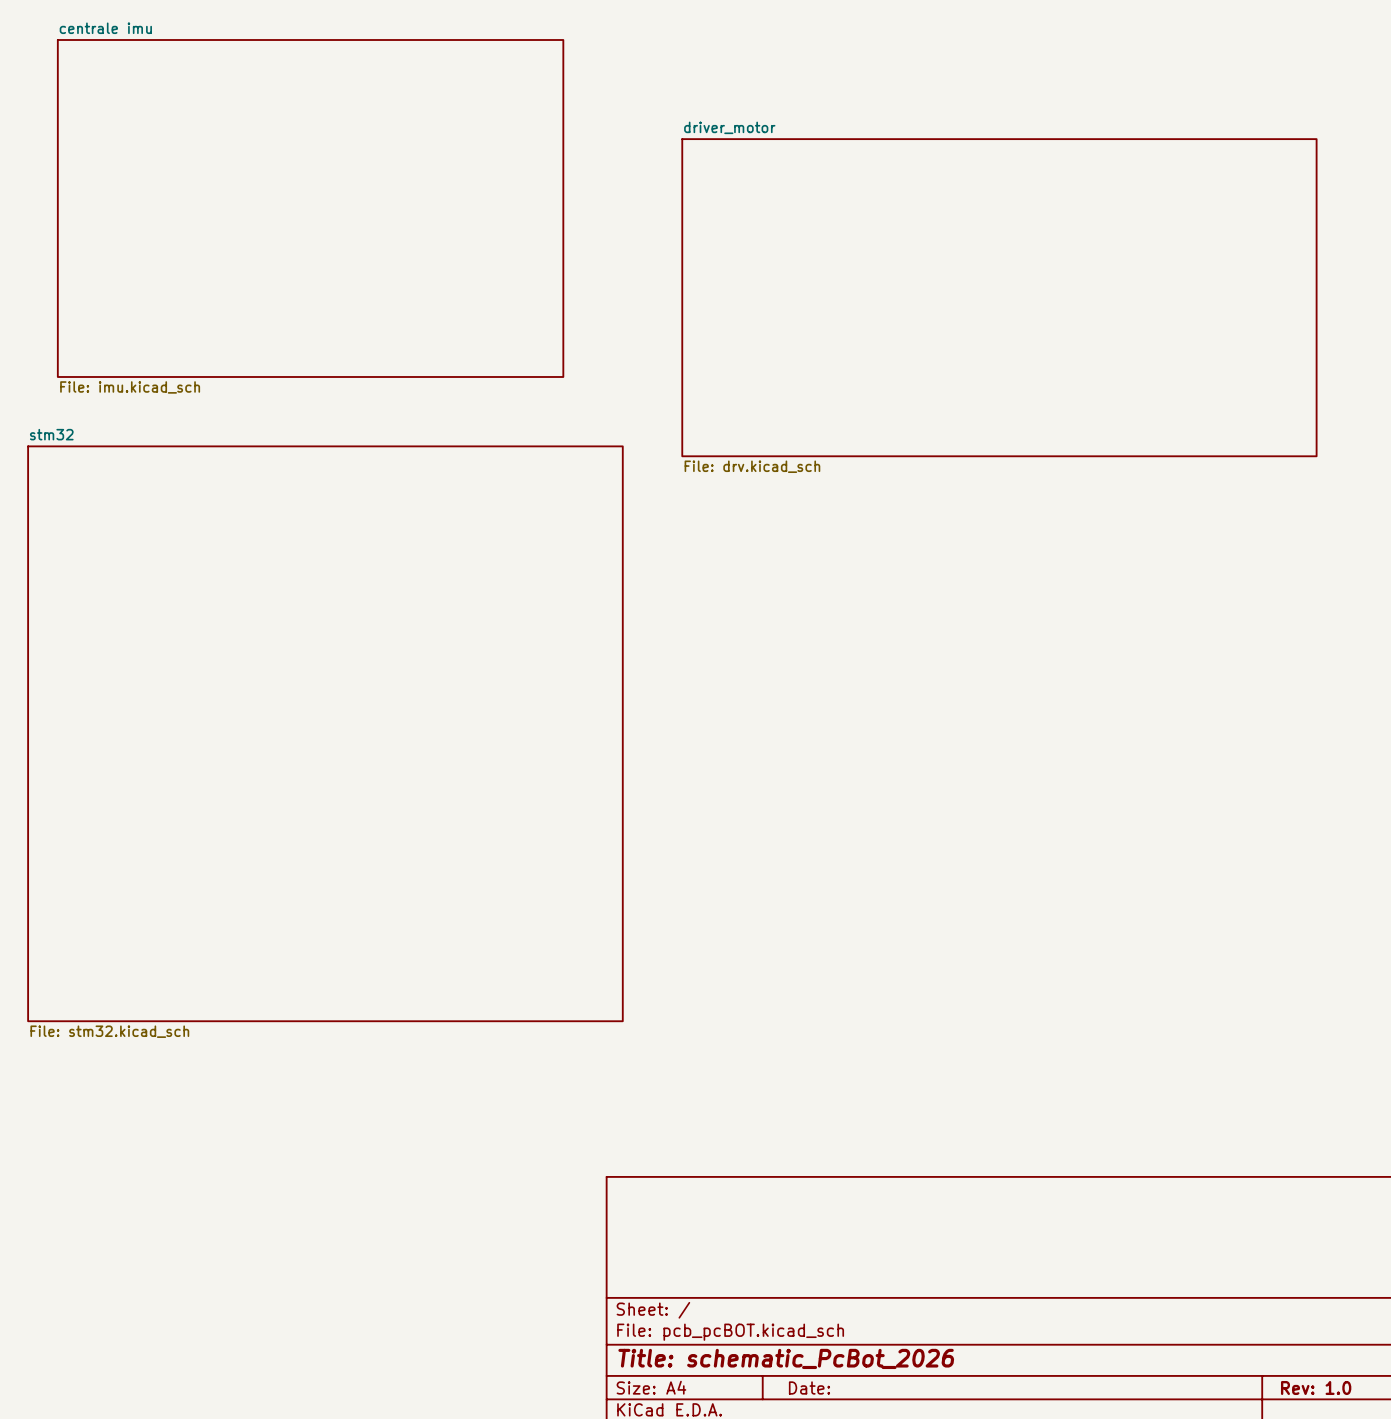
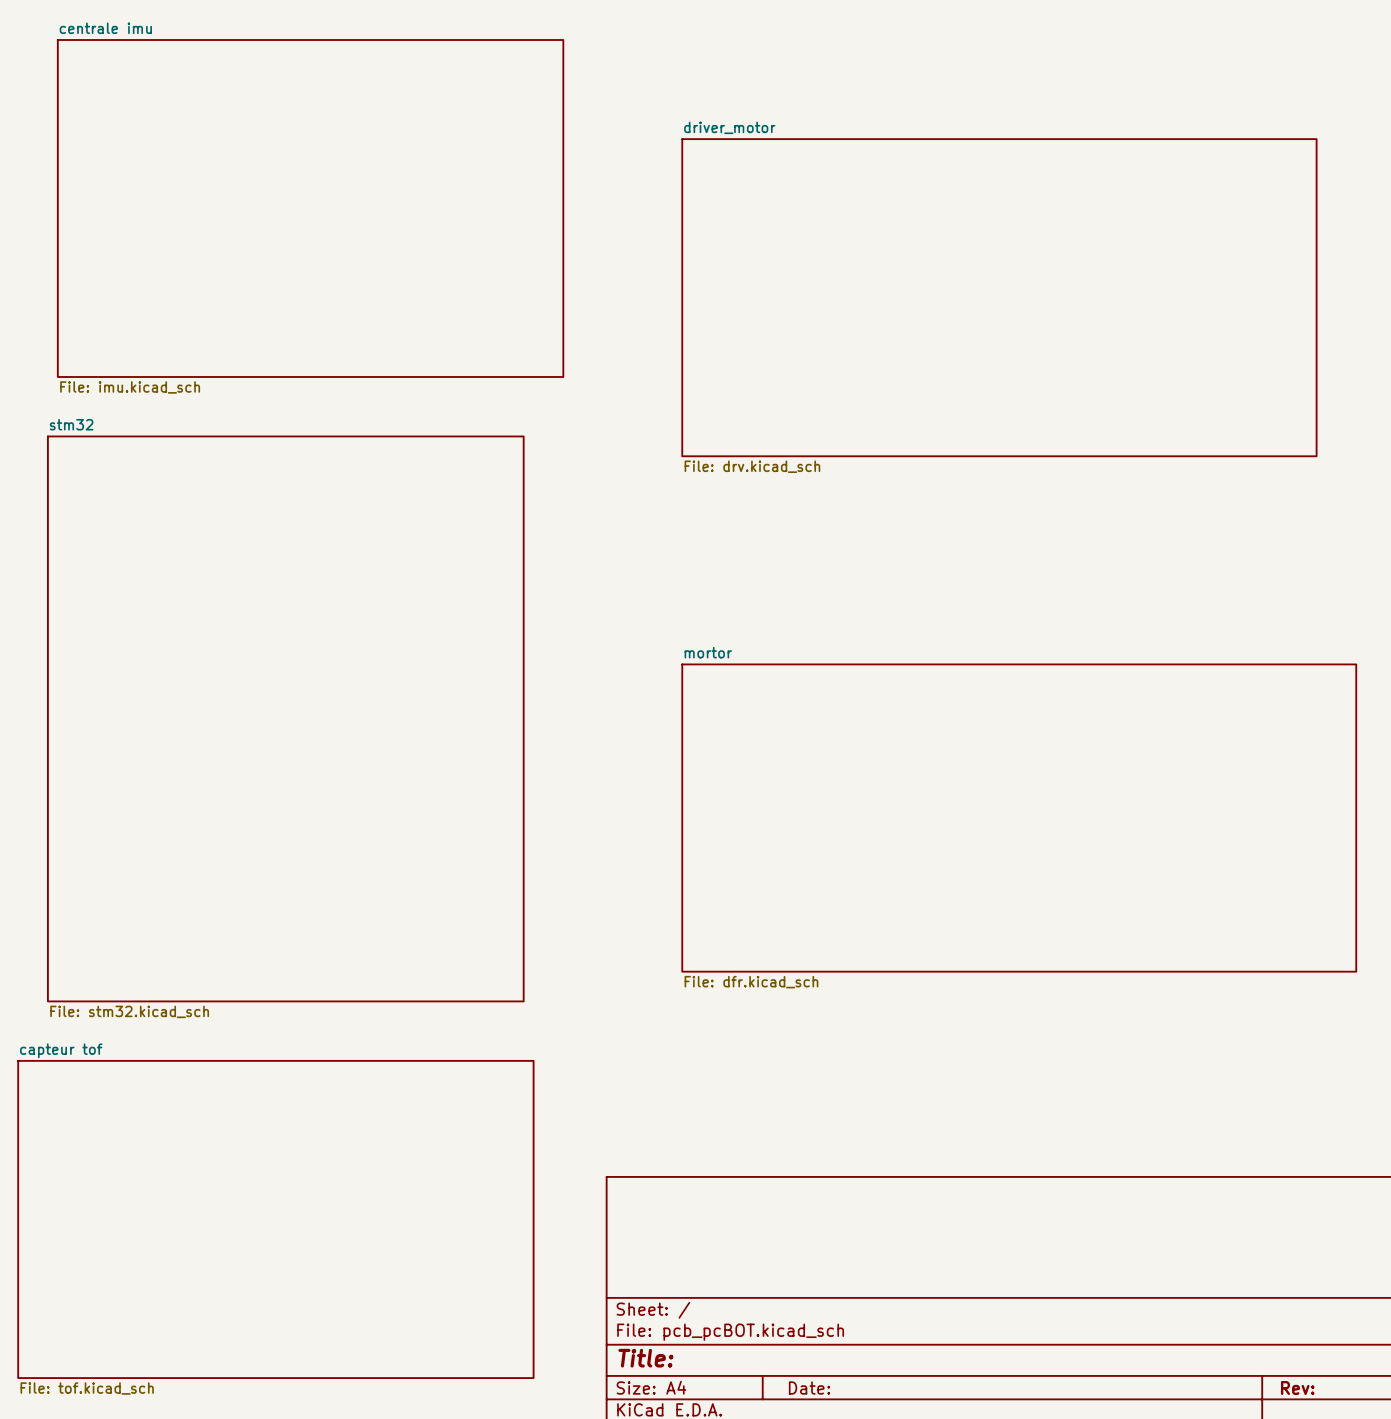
sheet stm32 name position: stm32 (51, 434) -> stm32 (71, 424)
sheet stm32 shape: [27, 445, 624, 1022] -> [47, 435, 525, 1003]
sheet mortor: none -> File: dfr.kicad_sch (1019, 818)
sheet stm32 value position: File: stm32.kicad_sch (109, 1031) -> File: stm32.kicad_sch (129, 1011)
sheet capteur tof: none -> File: tof.kicad_sch (275, 1219)
title block: Title: schematic_PcBot_2026 (786, 1358) -> Title: (645, 1358)
title block: Rev: 1.0 (1316, 1387) -> Rev: (1297, 1387)

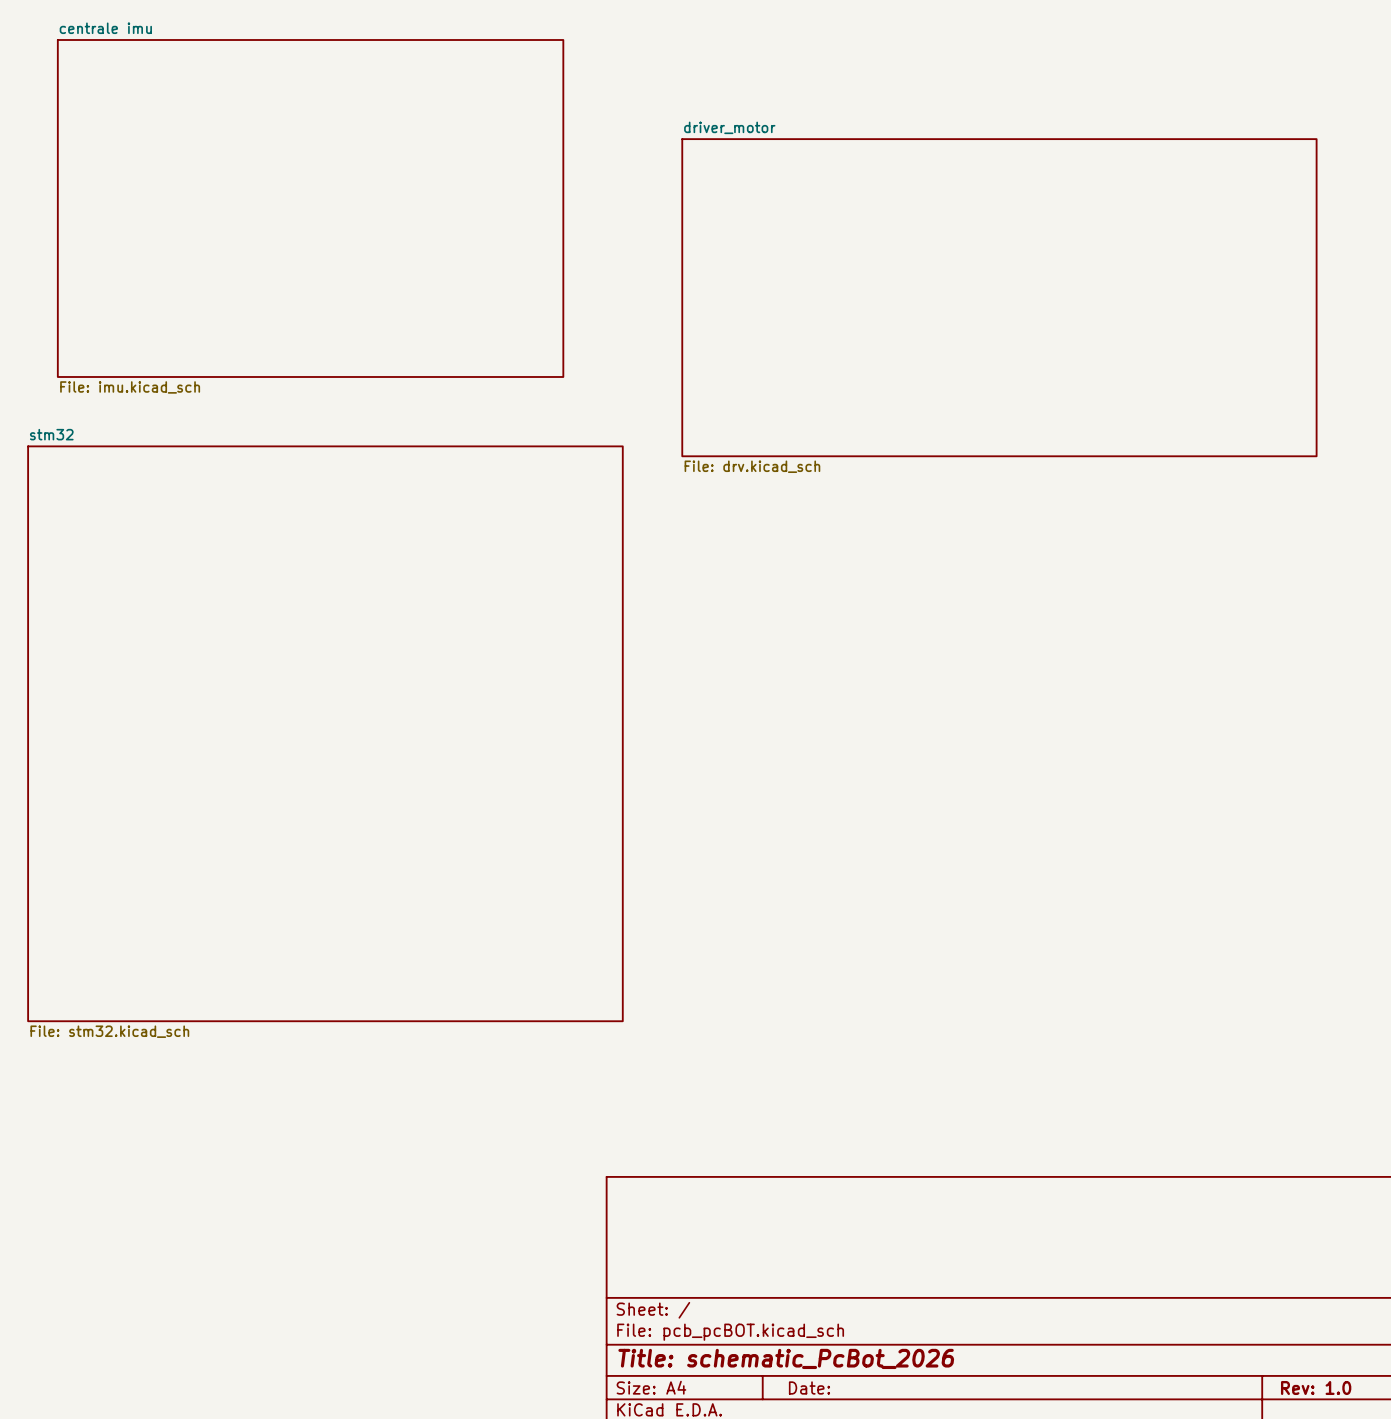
sheet stm32 name position: stm32 (71, 424) -> stm32 (51, 434)
sheet stm32 shape: [47, 435, 525, 1003] -> [27, 445, 624, 1022]
sheet mortor: File: dfr.kicad_sch (1019, 818) -> none
sheet stm32 value position: File: stm32.kicad_sch (129, 1011) -> File: stm32.kicad_sch (109, 1031)
sheet capteur tof: File: tof.kicad_sch (275, 1219) -> none
title block: Title: (645, 1358) -> Title: schematic_PcBot_2026 (786, 1358)
title block: Rev: (1297, 1387) -> Rev: 1.0 (1316, 1387)

